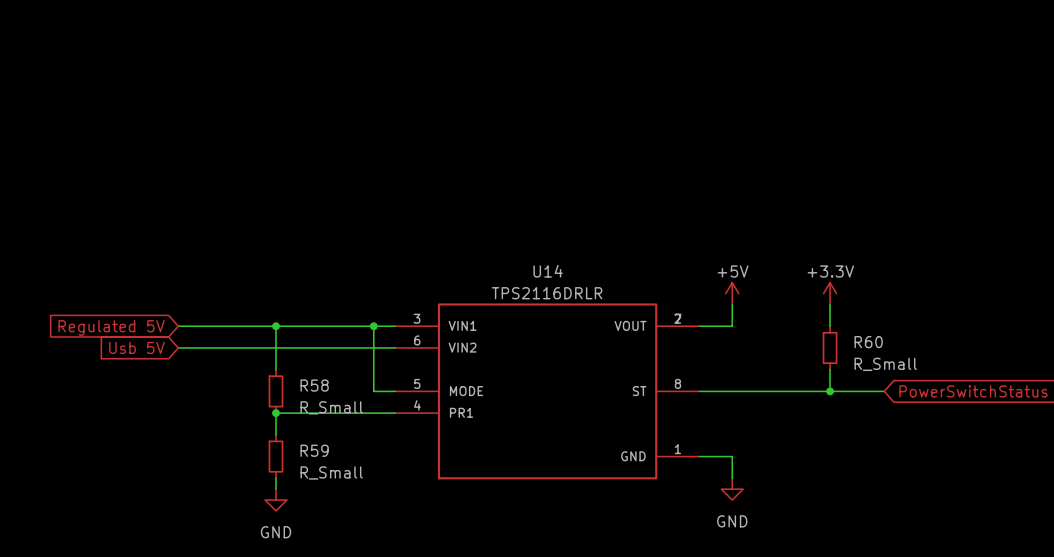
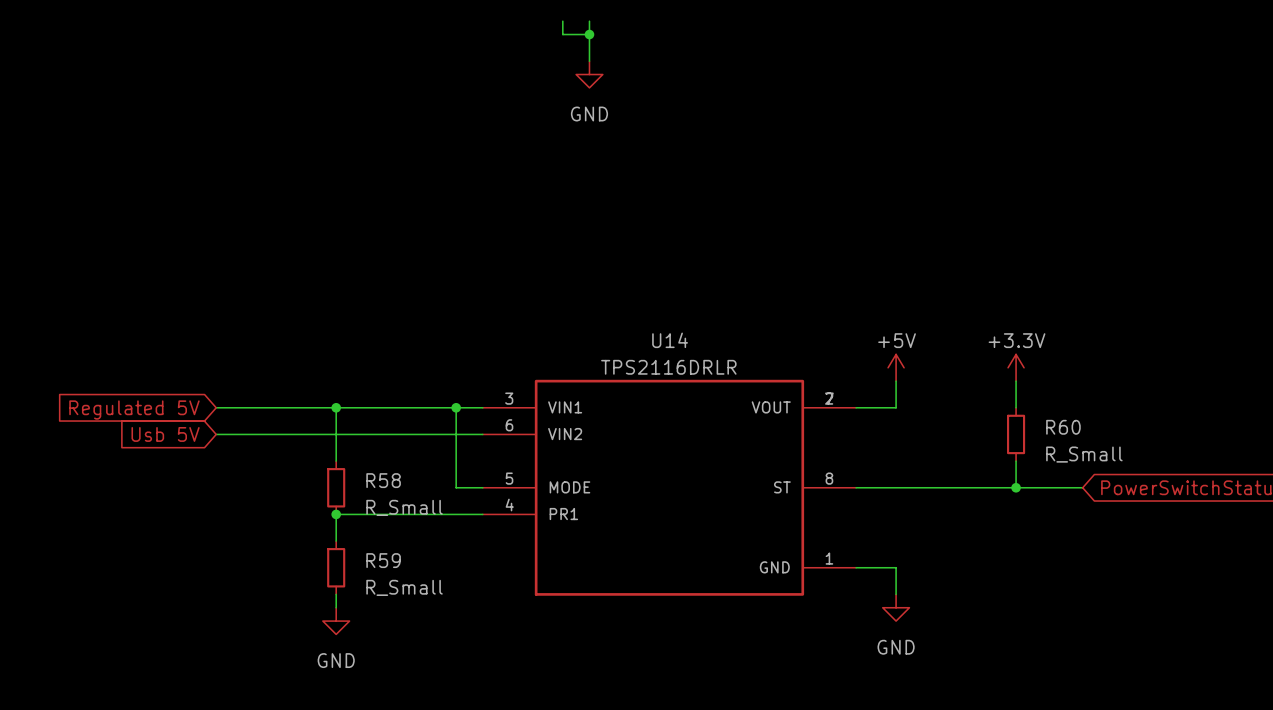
wire: none -> (562, 21) (562, 34) (589, 34)
wire: none -> (589, 21) (589, 61)
junction: none -> (589, 34)
power symbol: none -> GND (589, 74)

